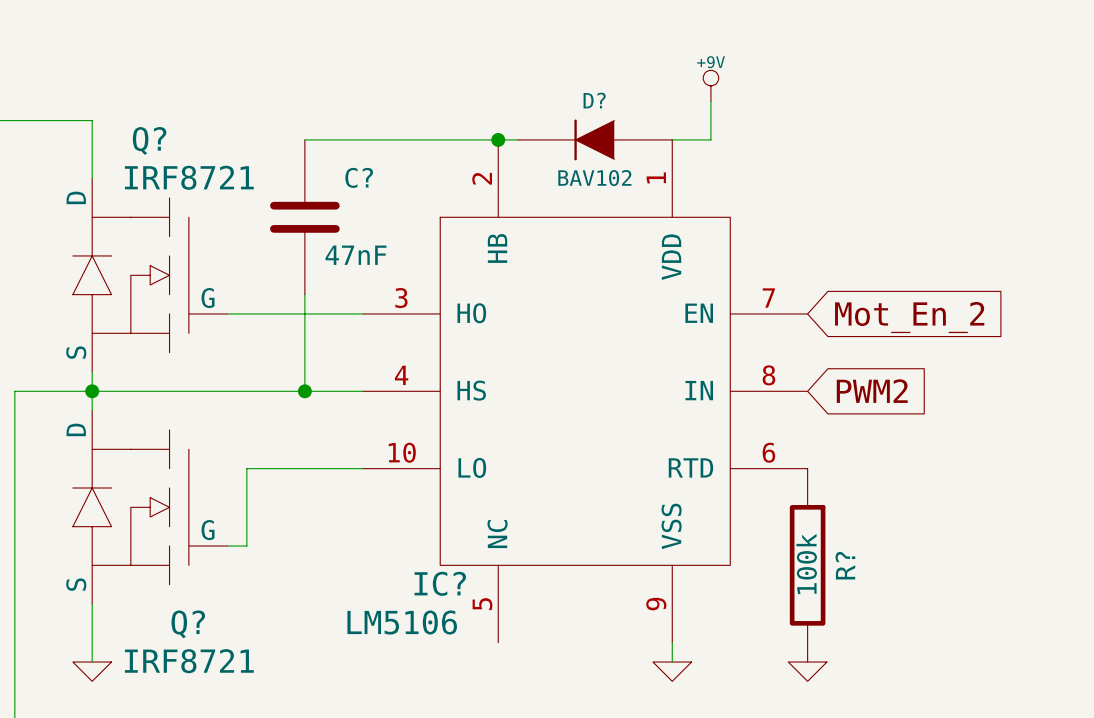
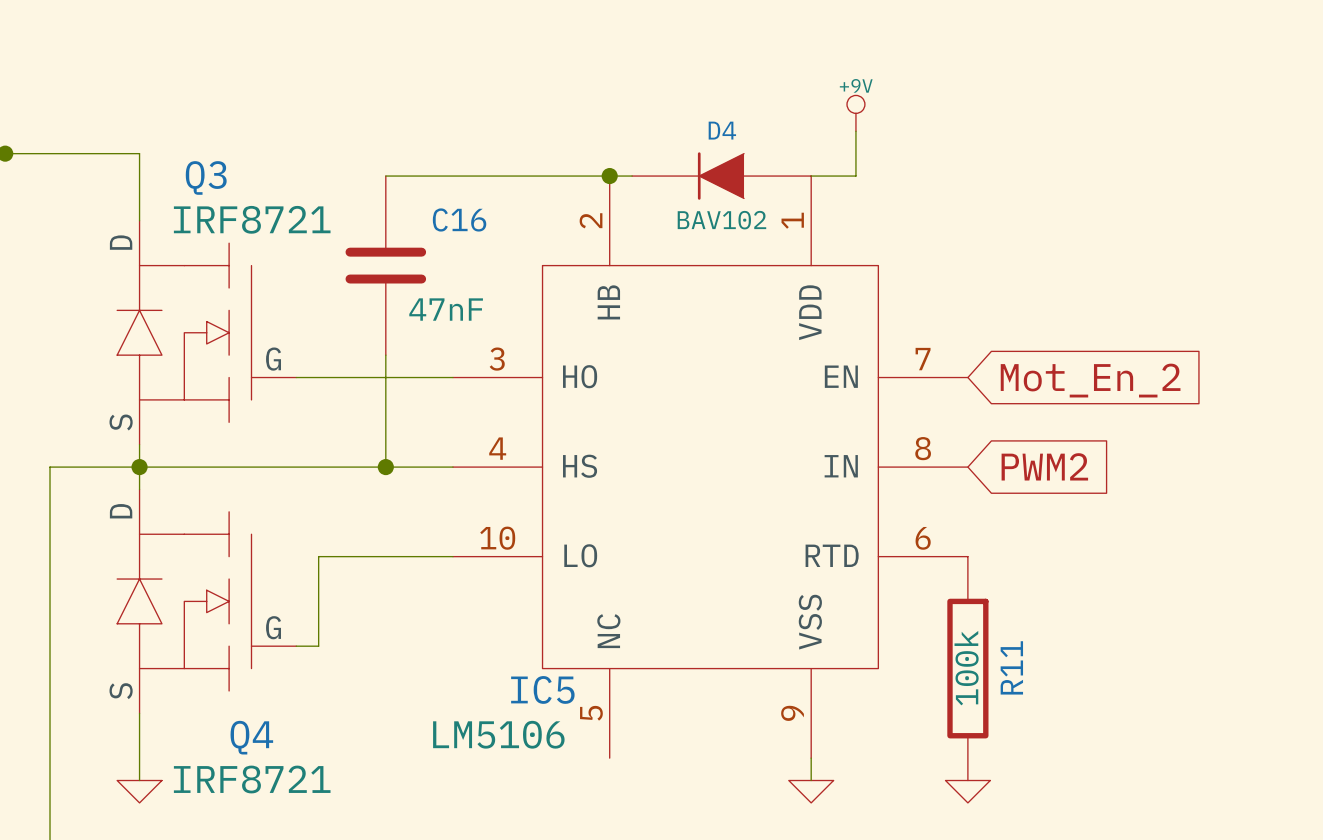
D? name: D? (594, 100) -> D4 (722, 130)
Q? name: Q? (149, 140) -> Q3 (206, 177)
C? name: C? (359, 177) -> C16 (459, 219)
R? name: R? (845, 565) -> R11 (1011, 667)
IC? name: IC? (440, 583) -> IC5 (542, 689)
Q? name: Q? (188, 624) -> Q4 (251, 737)

